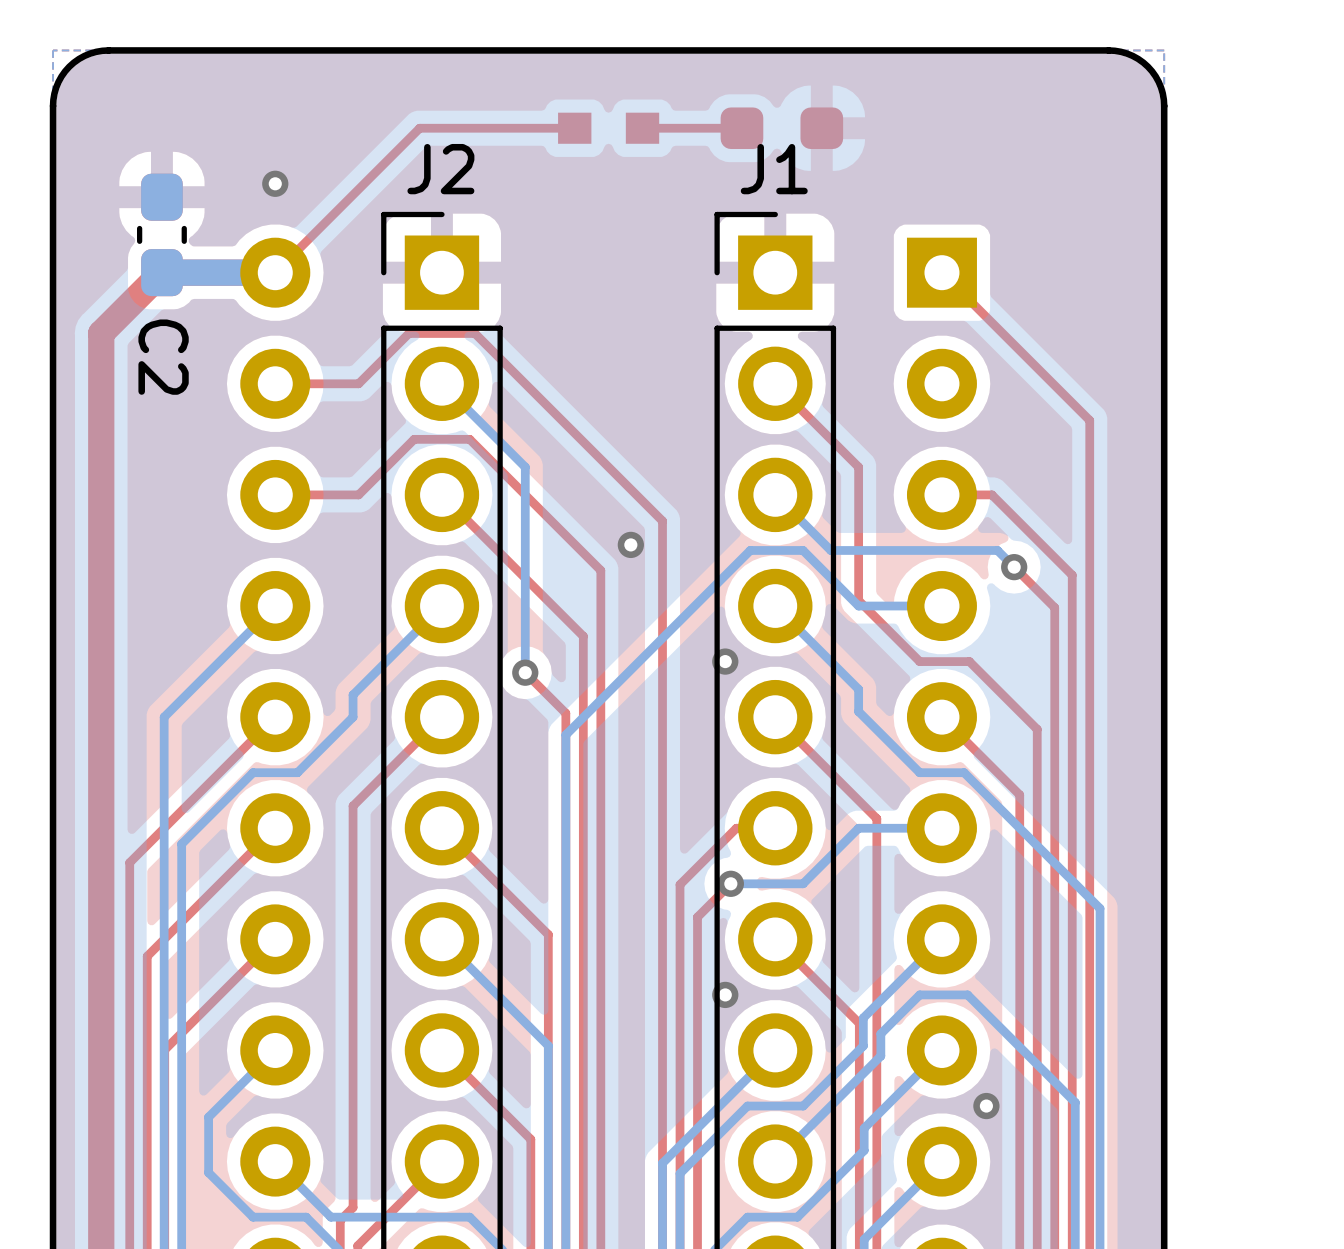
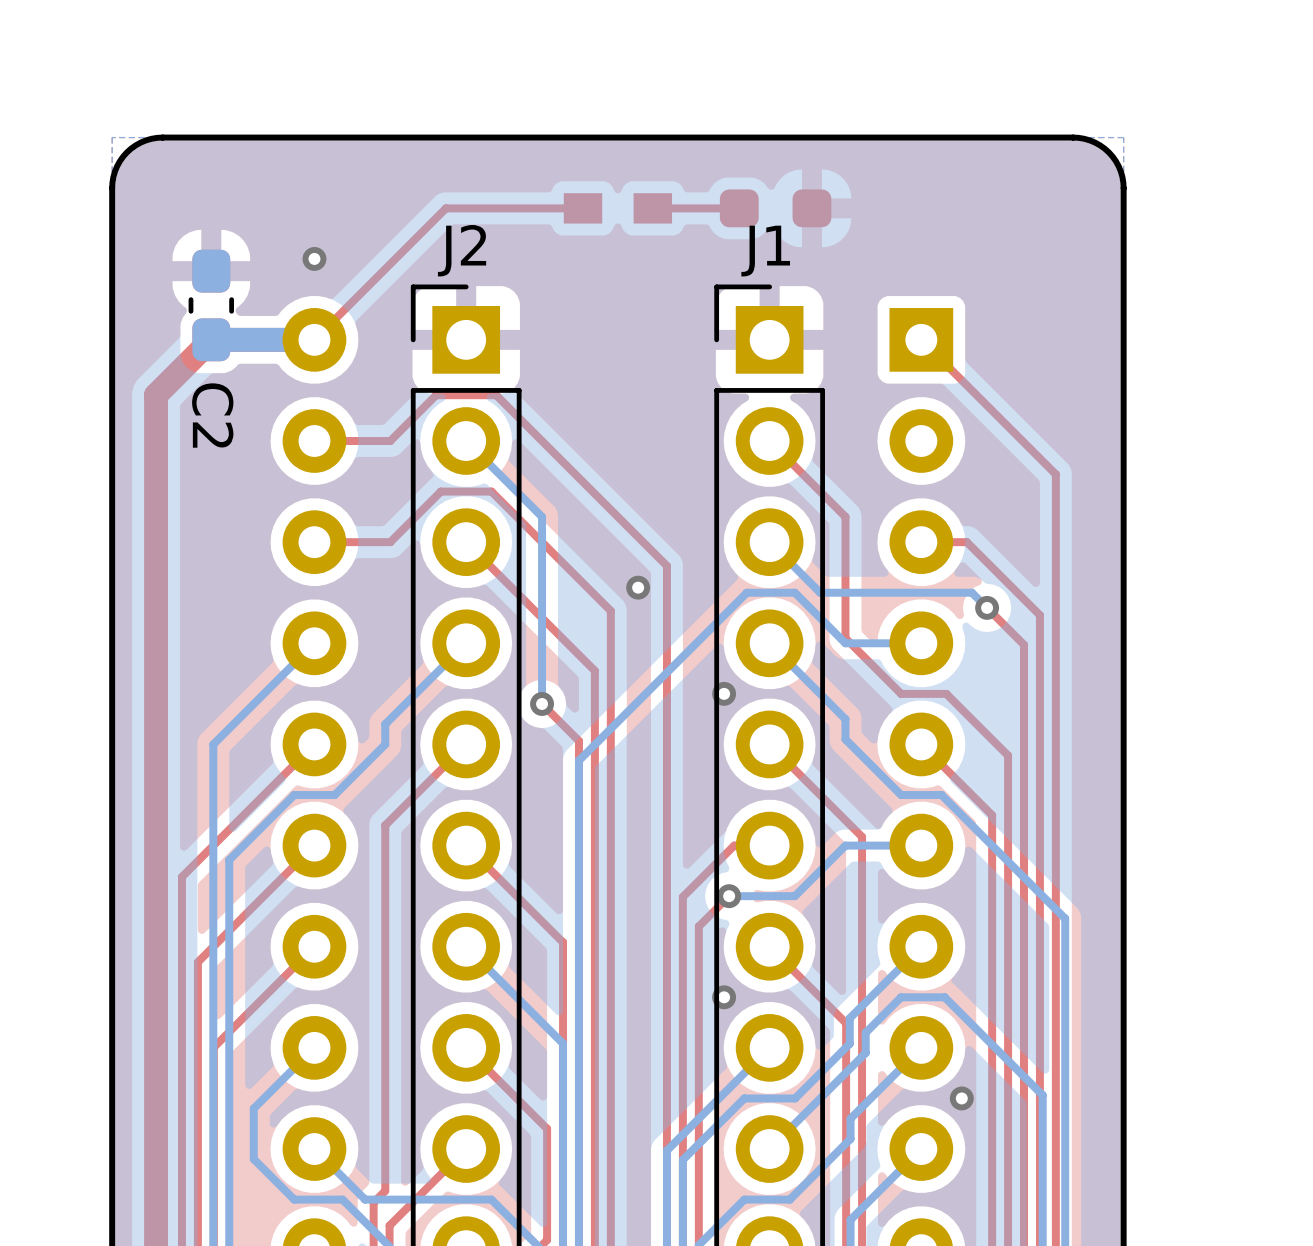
part footprint: [558, 112, 660, 144] -> [563, 193, 673, 224]

